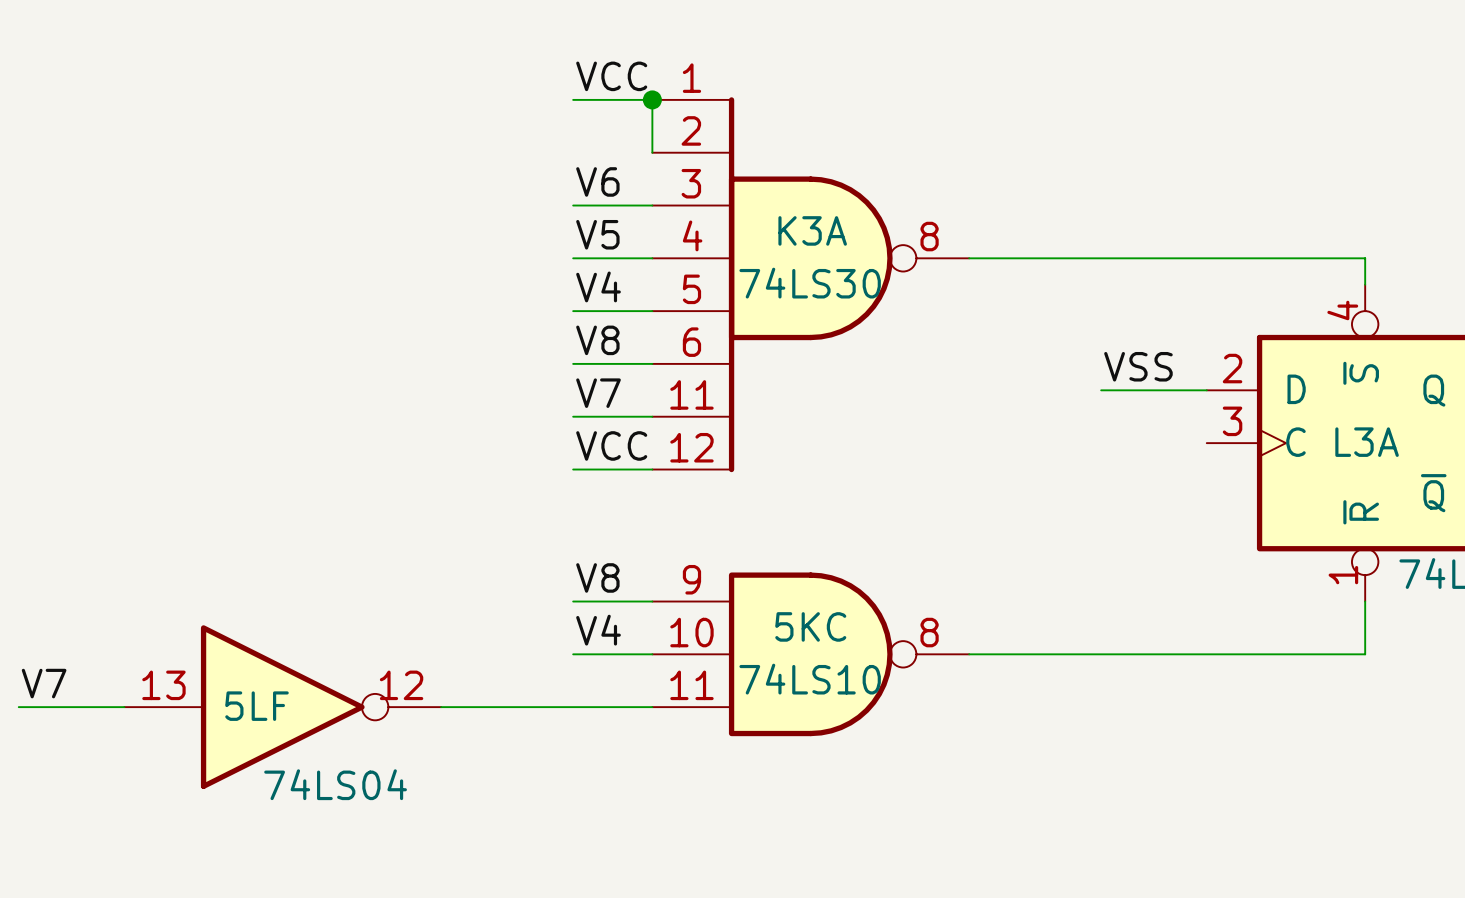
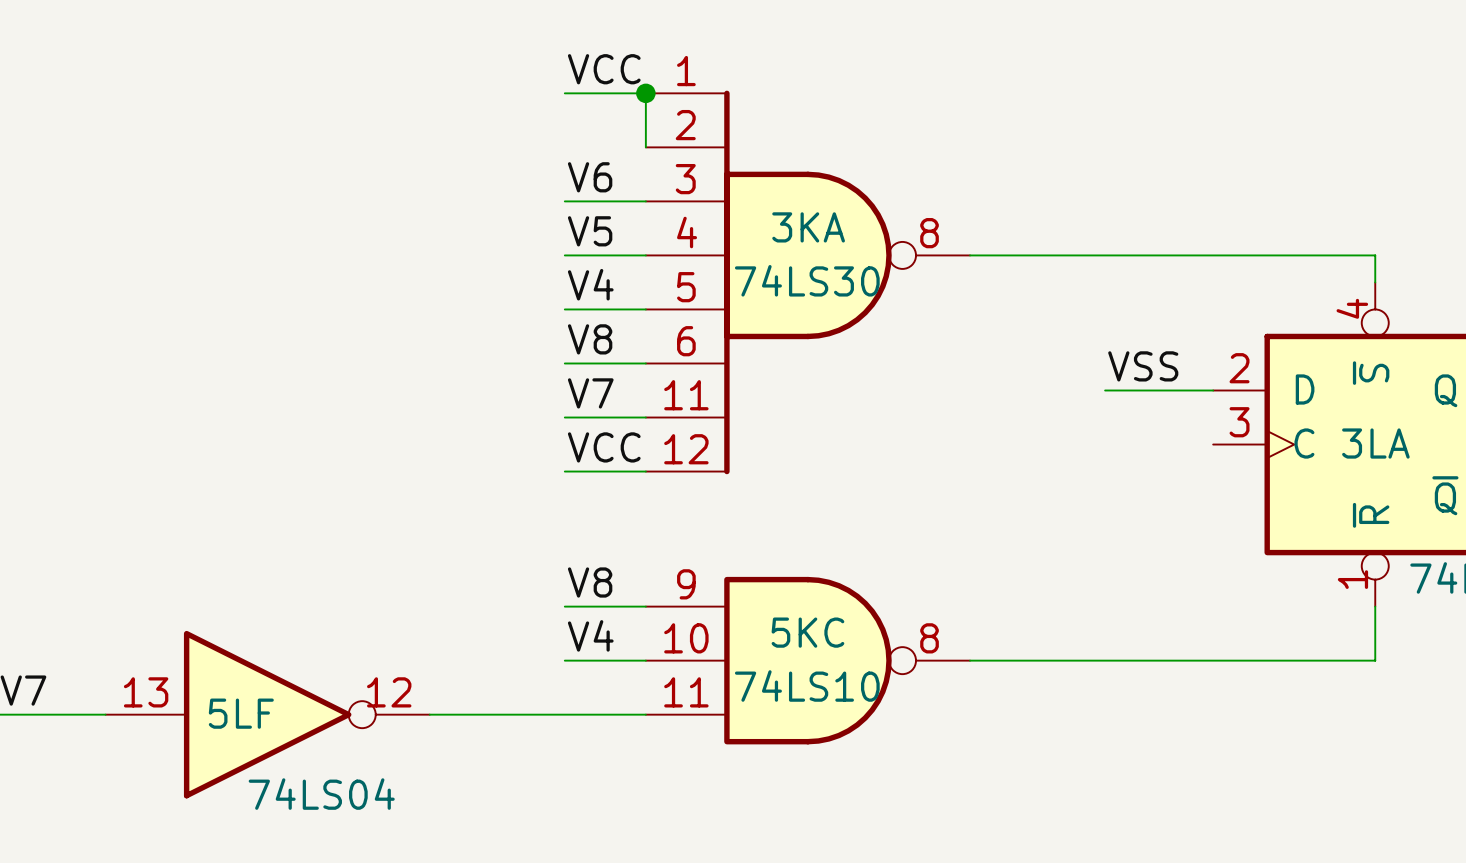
K3A name: K3A (812, 230) -> 3KA (808, 227)
L3A name: L3A (1367, 442) -> 3LA (1375, 443)

